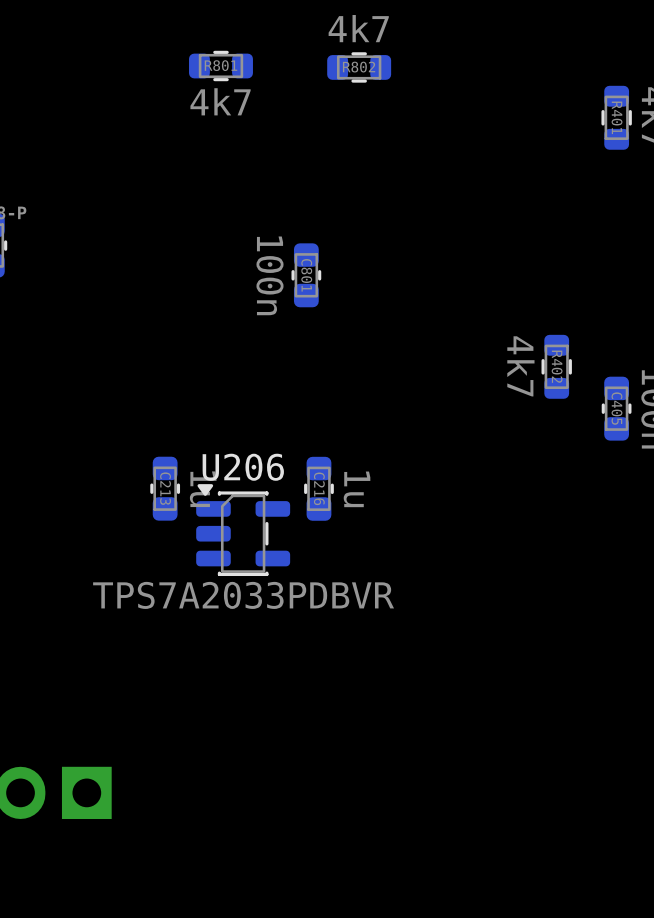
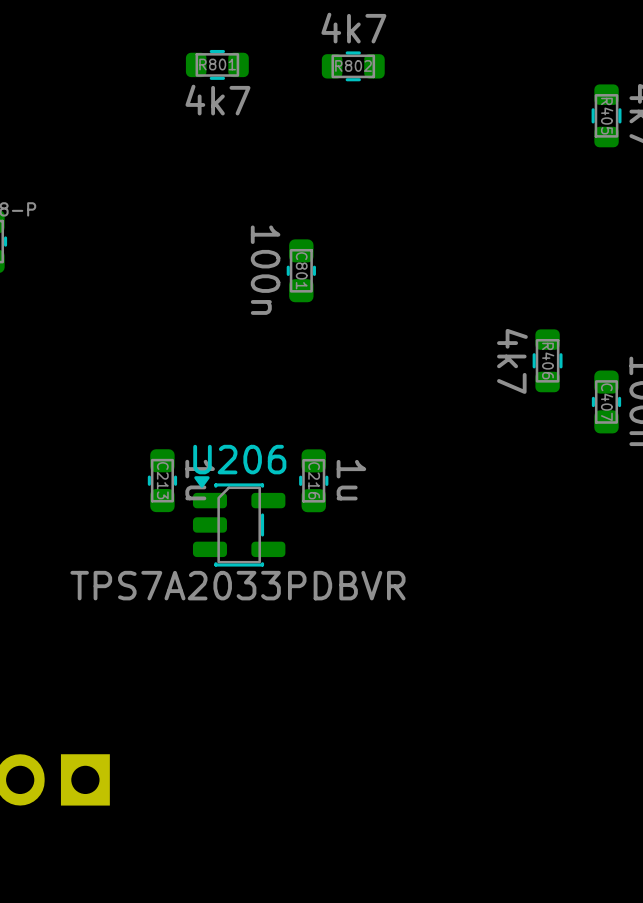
R401 name: R401 (617, 117) -> R405 (607, 116)
R402 name: R402 (557, 366) -> R406 (548, 361)
C405 name: C405 (616, 408) -> C407 (607, 402)

